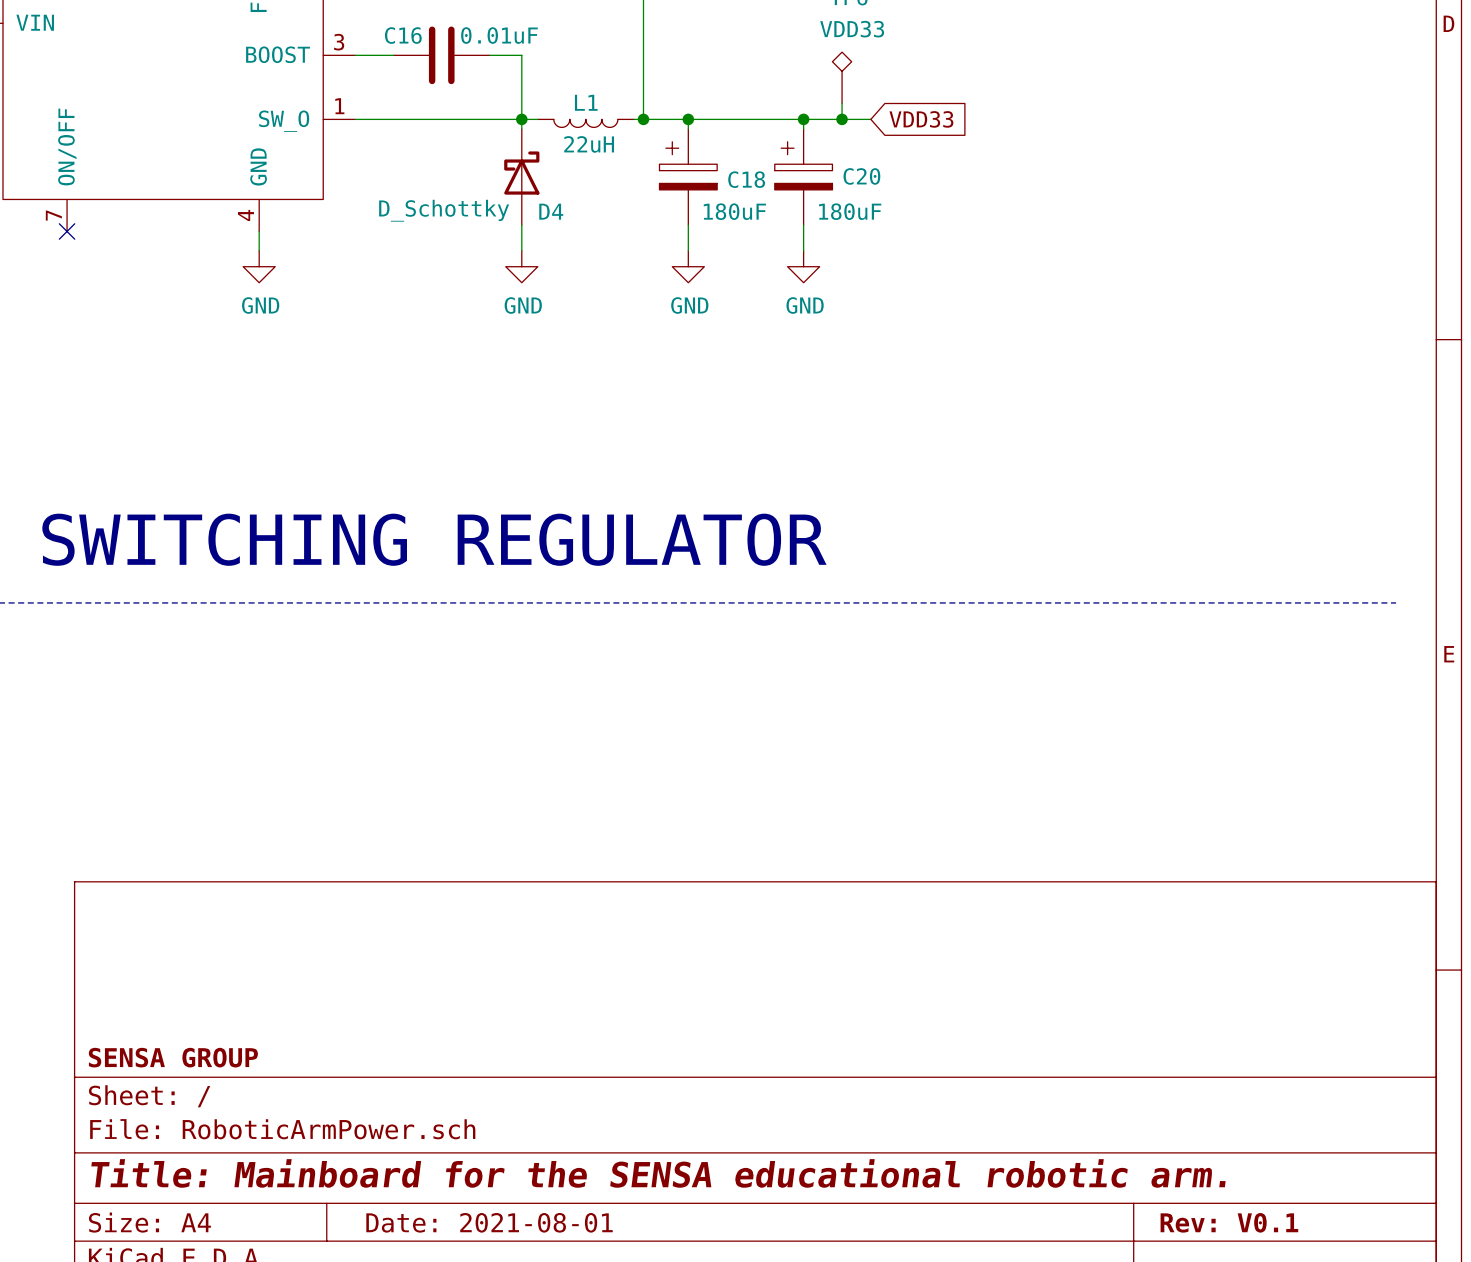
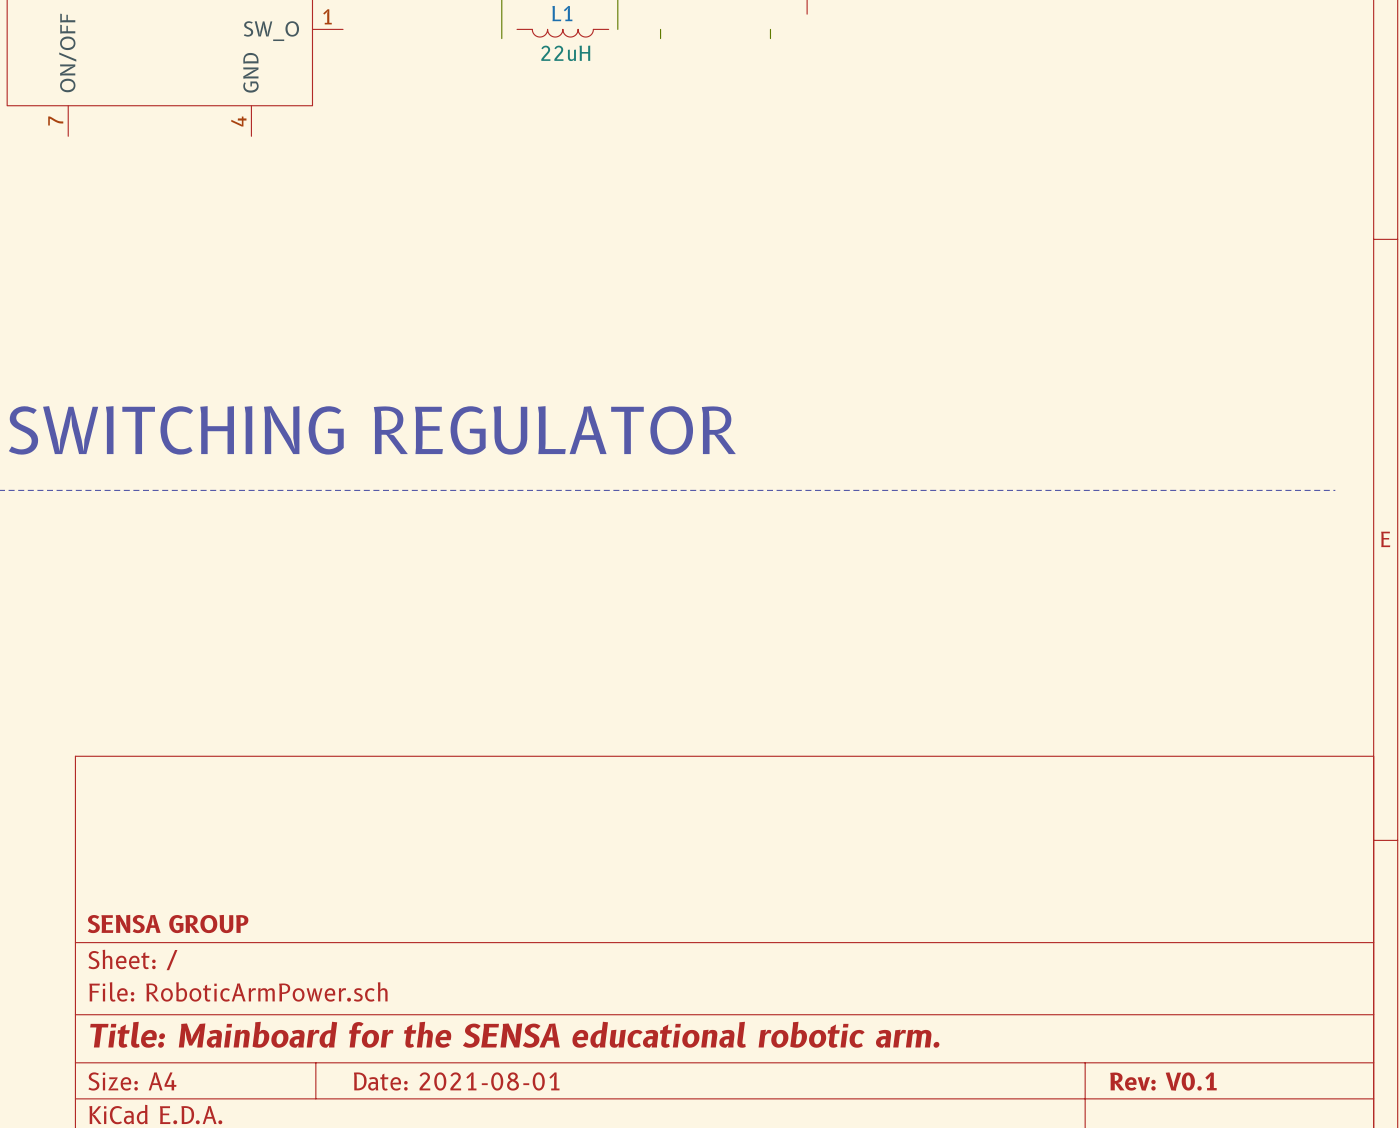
wire: (842, 103) (842, 119) -> none
wire: (355, 119) (537, 119) -> none
junction: (521, 119) -> none
wire: (633, 119) (870, 119) -> none
junction: (643, 119) -> none
junction: (688, 119) -> none
junction: (803, 119) -> none
junction: (842, 119) -> none
global label: VDD33 (921, 119) -> none
D4: D_Schottky (521, 177) -> none
C18: 180uF (688, 177) -> none
C20: 180uF (803, 177) -> none
wire: (521, 225) (521, 250) -> none
wire: (688, 225) (688, 250) -> none
wire: (803, 225) (803, 250) -> none
no-connect mark: (67, 231) -> none
wire: (259, 231) (259, 250) -> none
power symbol: GND (259, 266) -> none
power symbol: GND (521, 266) -> none
power symbol: GND (688, 266) -> none
power symbol: GND (803, 266) -> none

